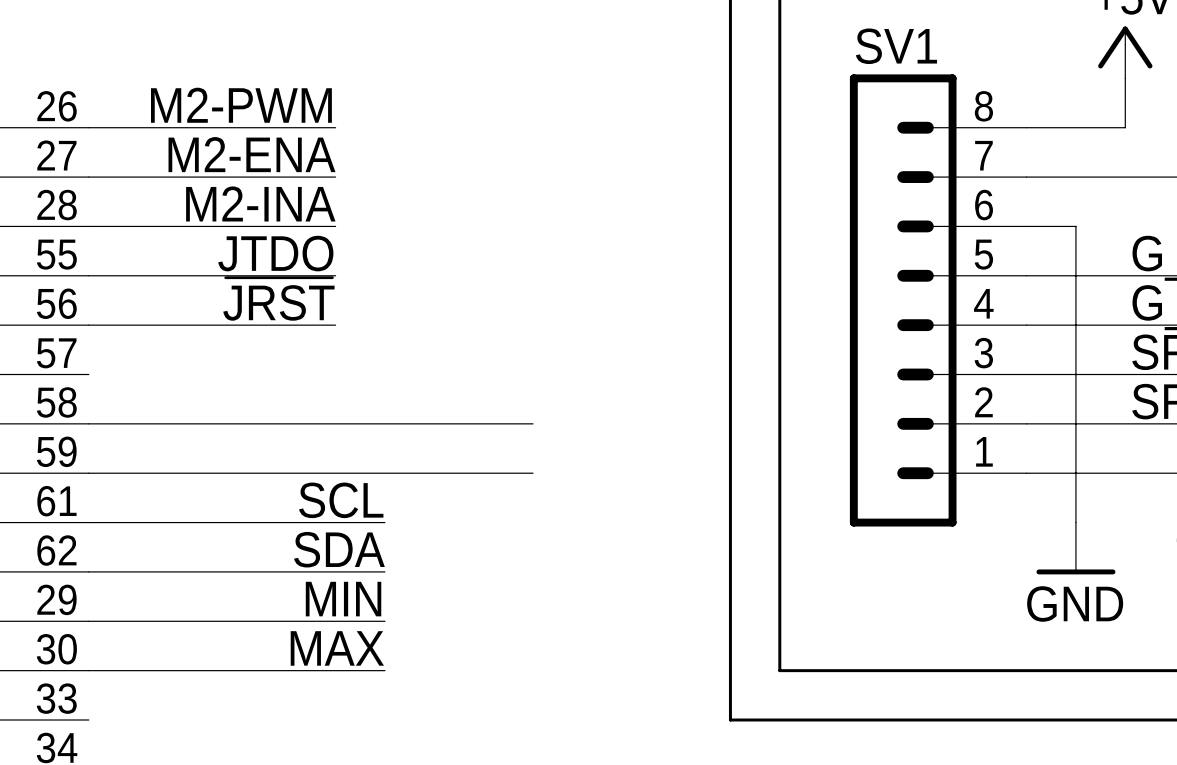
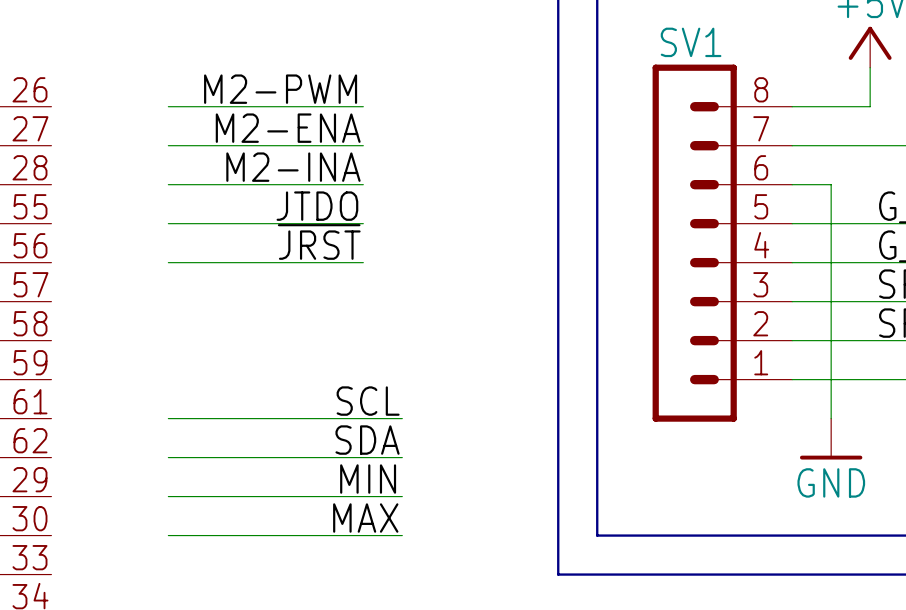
label position: M2-PWM (241, 105) -> M2-PWM (280, 89)
wire: (88, 127) (236, 127) -> (246, 106) (363, 106)
label position: M2-ENA (252, 154) -> M2-ENA (288, 128)
wire: (88, 177) (236, 177) -> (246, 145) (363, 145)
label position: M2-INA (260, 203) -> M2-INA (293, 167)
wire: (88, 226) (236, 226) -> (246, 184) (363, 184)
label position: JTDO (275, 253) -> JTDO (317, 206)
wire: (88, 275) (236, 275) -> (246, 223) (363, 223)
label position: ~{JRST} (278, 299) -> ~{JRST} (319, 241)
wire: (88, 325) (236, 325) -> (246, 262) (363, 262)
wire: (88, 423) (533, 423) -> none
wire: (88, 473) (533, 473) -> none
label position: SCL (341, 500) -> SCL (368, 401)
wire: (88, 522) (236, 522) -> (285, 418) (402, 418)
label position: SDA (339, 549) -> SDA (367, 440)
wire: (88, 571) (236, 571) -> (285, 457) (402, 457)
label position: MIN (343, 599) -> MIN (368, 479)
wire: (88, 621) (236, 621) -> (285, 496) (402, 496)
label position: MAX (337, 648) -> MAX (365, 518)
wire: (88, 670) (236, 670) -> (285, 535) (402, 535)

